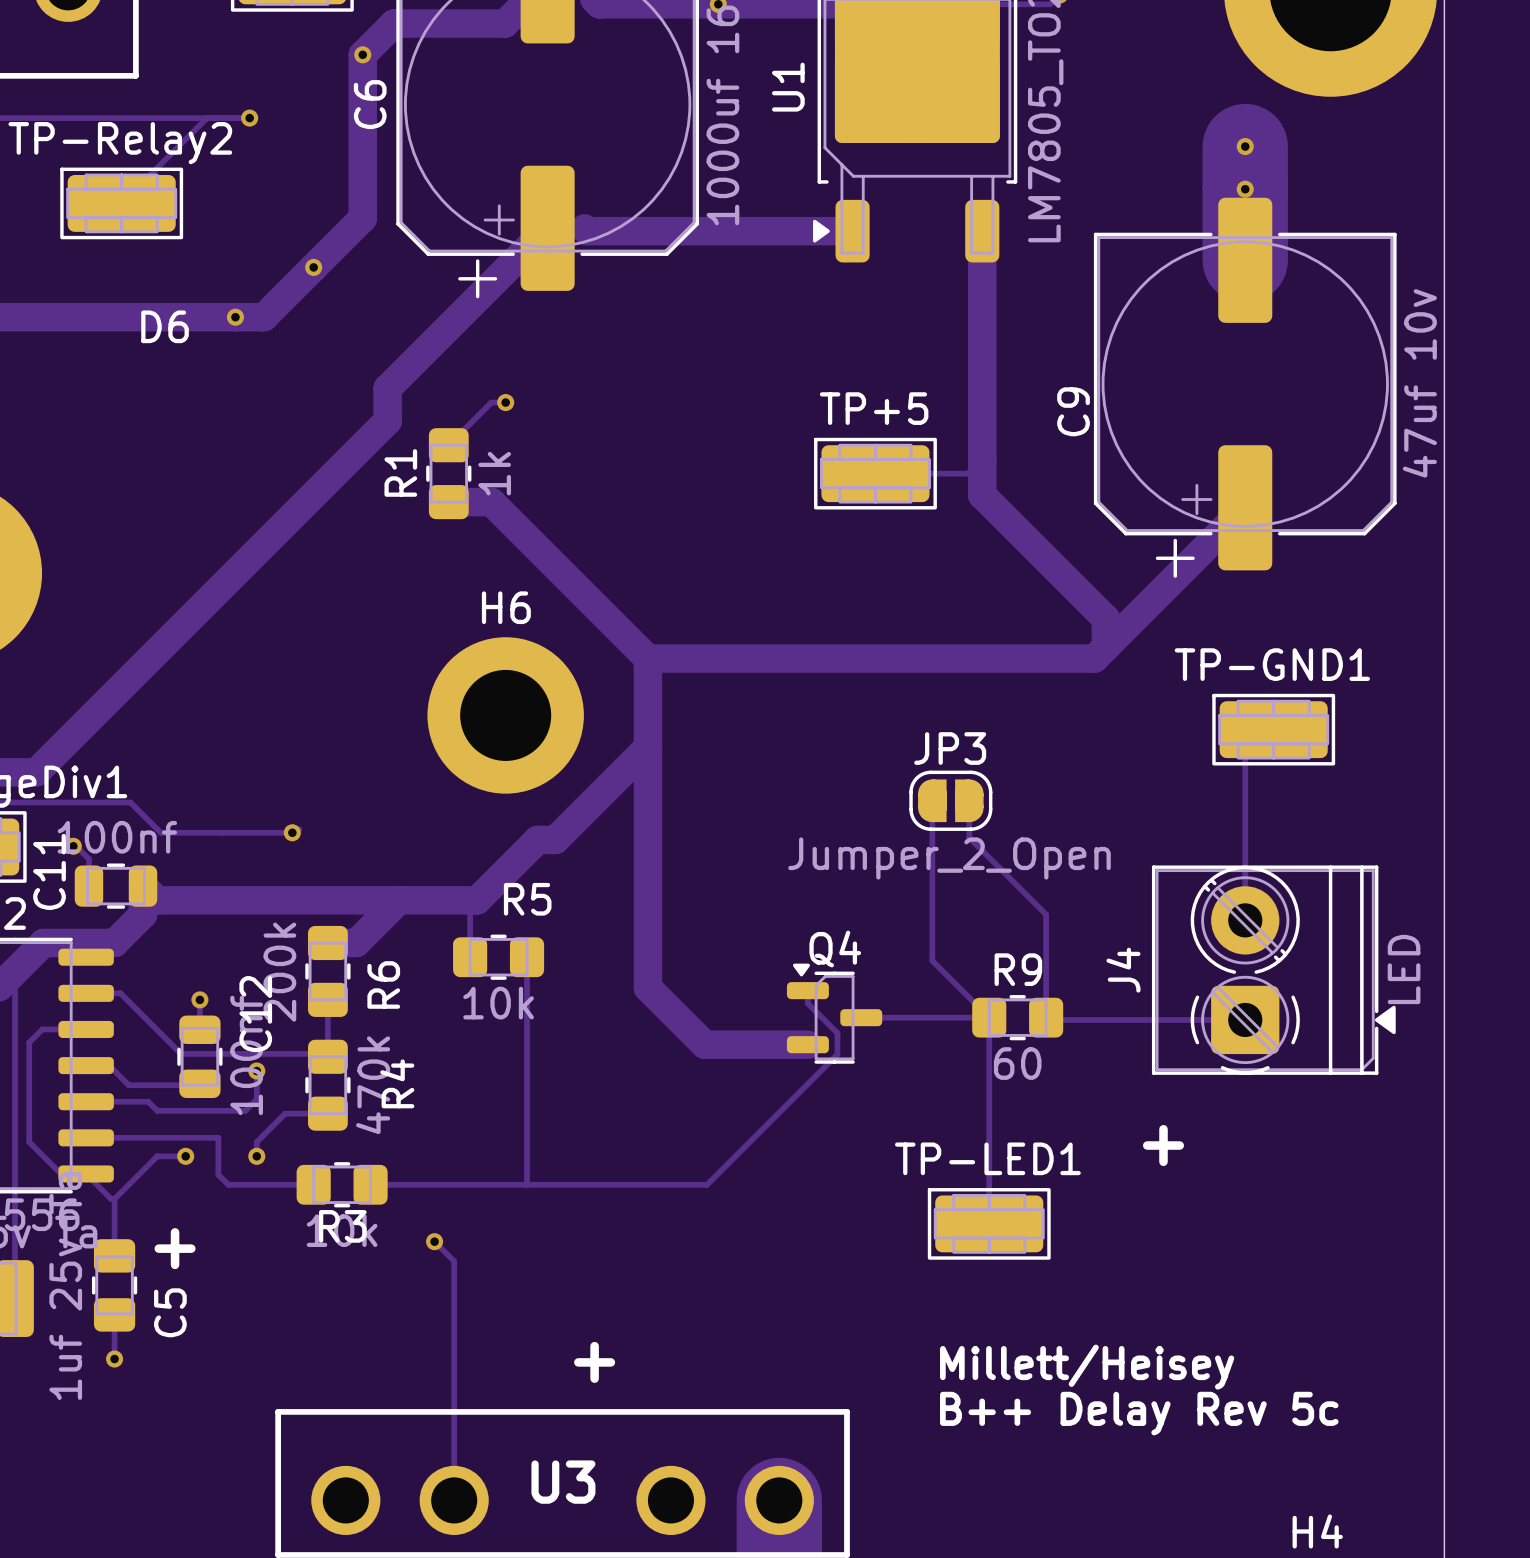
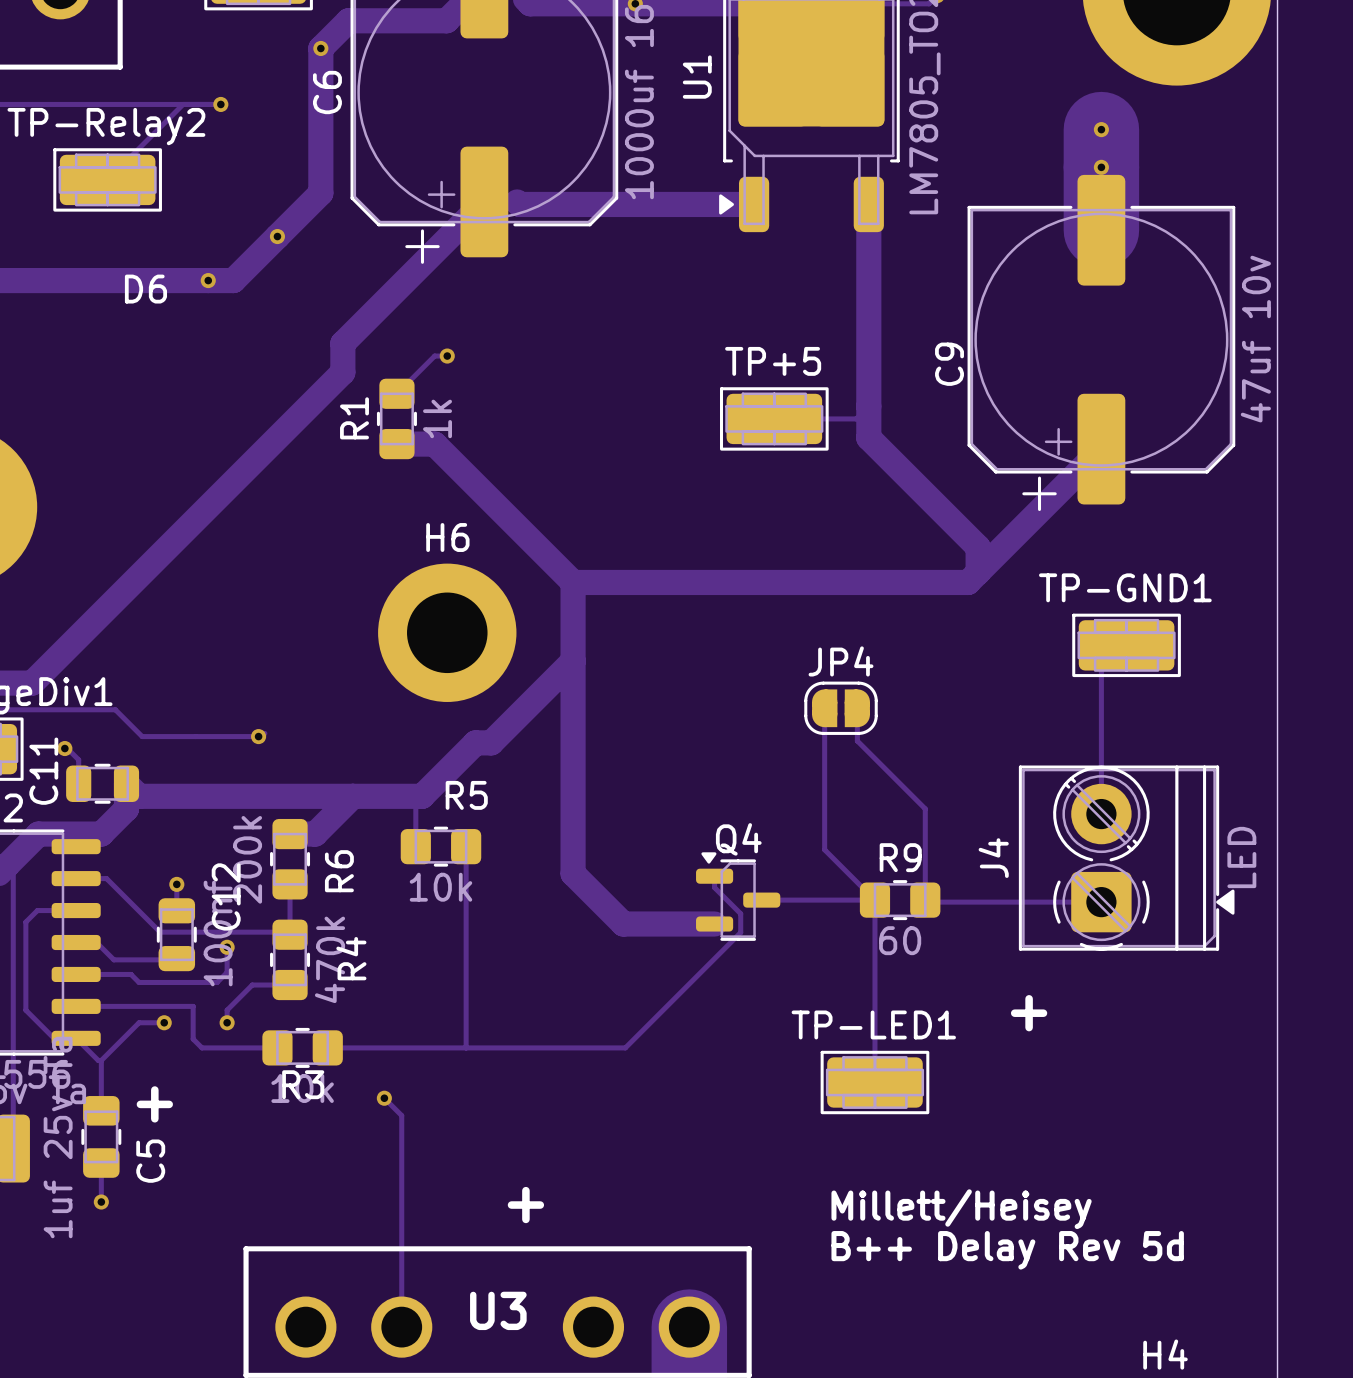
JP3 name: JP3 (950, 748) -> JP4 (841, 661)
C11 value: 100nf (117, 837) -> none
JP3 value: Jumper_2_Open (949, 858) -> none
text: B++ Delay Rev 5c (1139, 1413) -> B++ Delay Rev 5d (1007, 1250)

